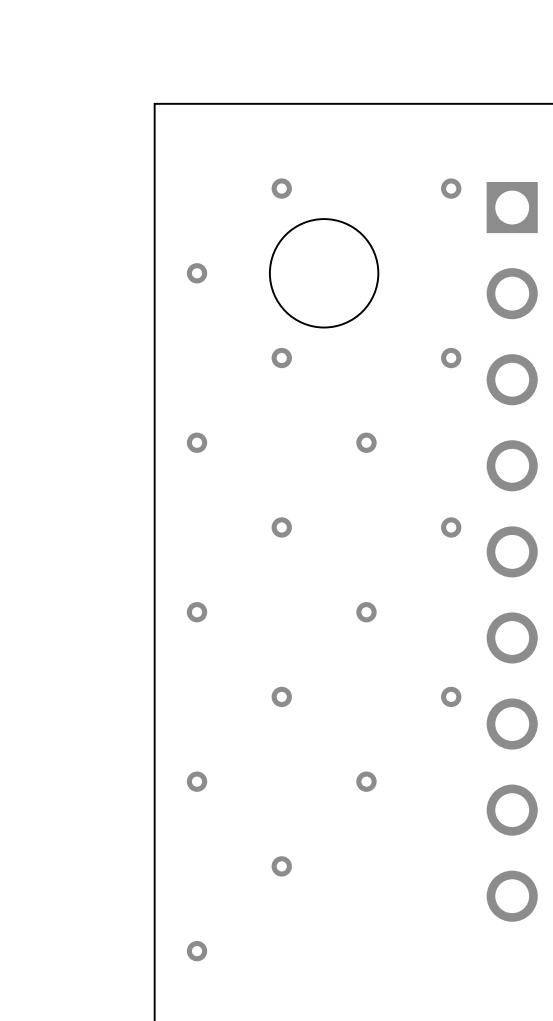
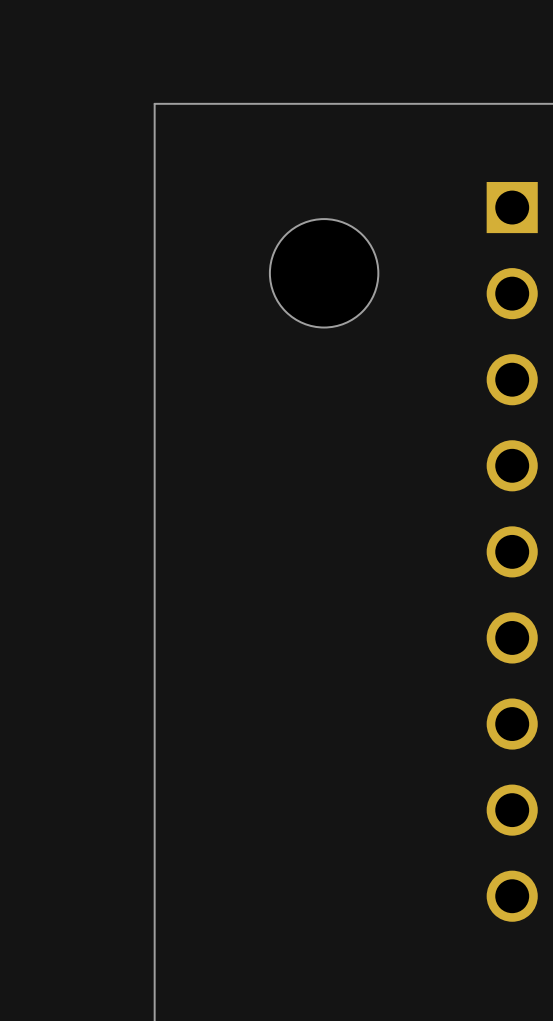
via: (281, 188) -> none
via: (451, 188) -> none
via: (197, 273) -> none
via: (281, 358) -> none
via: (451, 358) -> none
via: (197, 442) -> none
via: (366, 442) -> none
via: (281, 527) -> none
via: (451, 527) -> none
via: (197, 612) -> none
via: (366, 612) -> none
via: (281, 696) -> none
via: (451, 696) -> none
via: (197, 781) -> none
via: (366, 781) -> none
via: (281, 866) -> none
via: (197, 951) -> none

